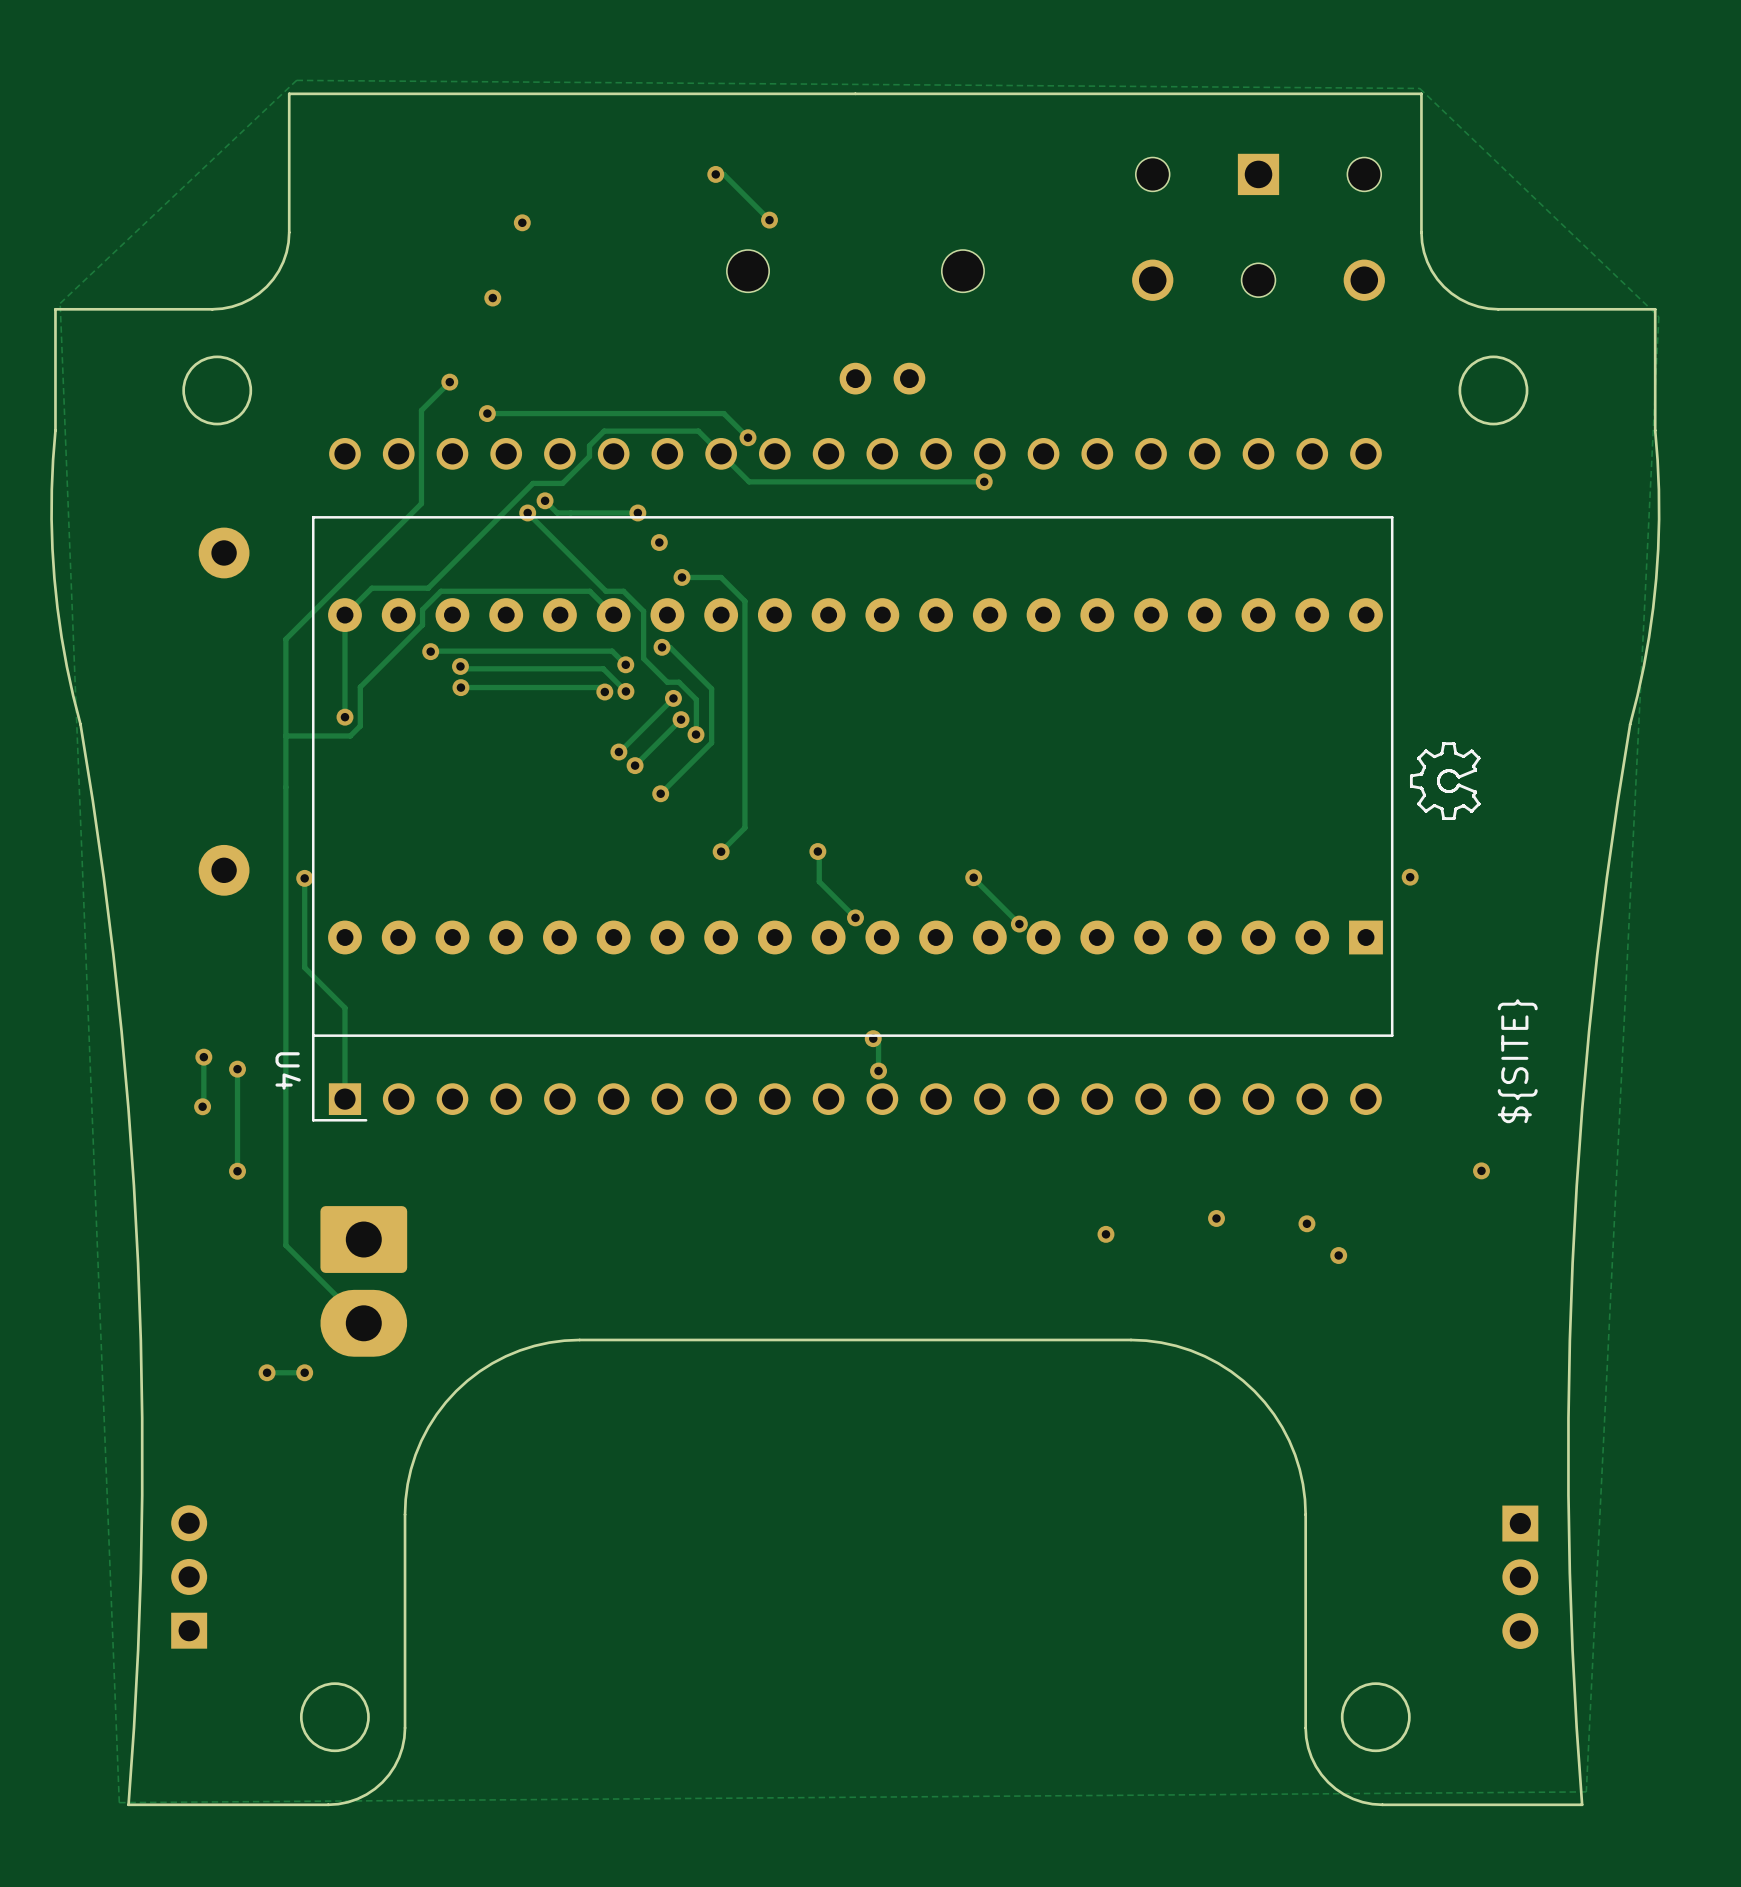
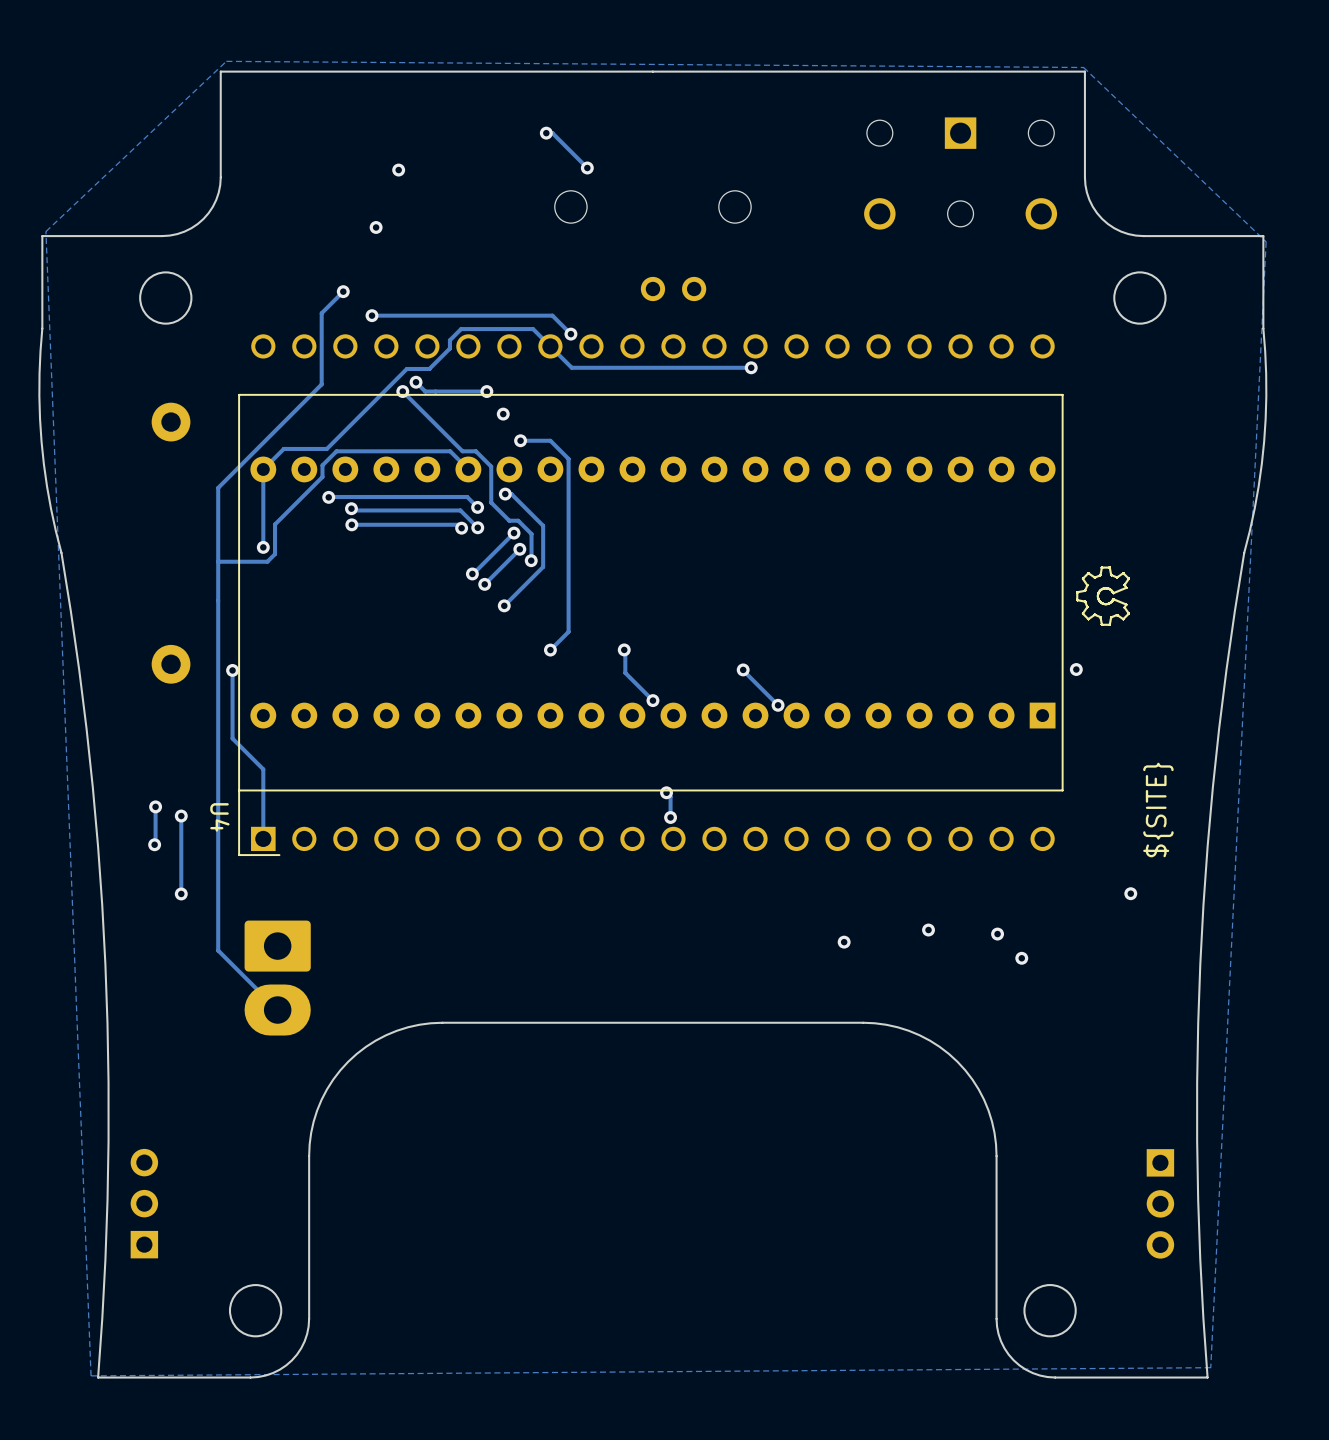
via: (267, 1372) -> none
track: (304, 1372) (267, 1372) -> none
via: (304, 1372) -> none

